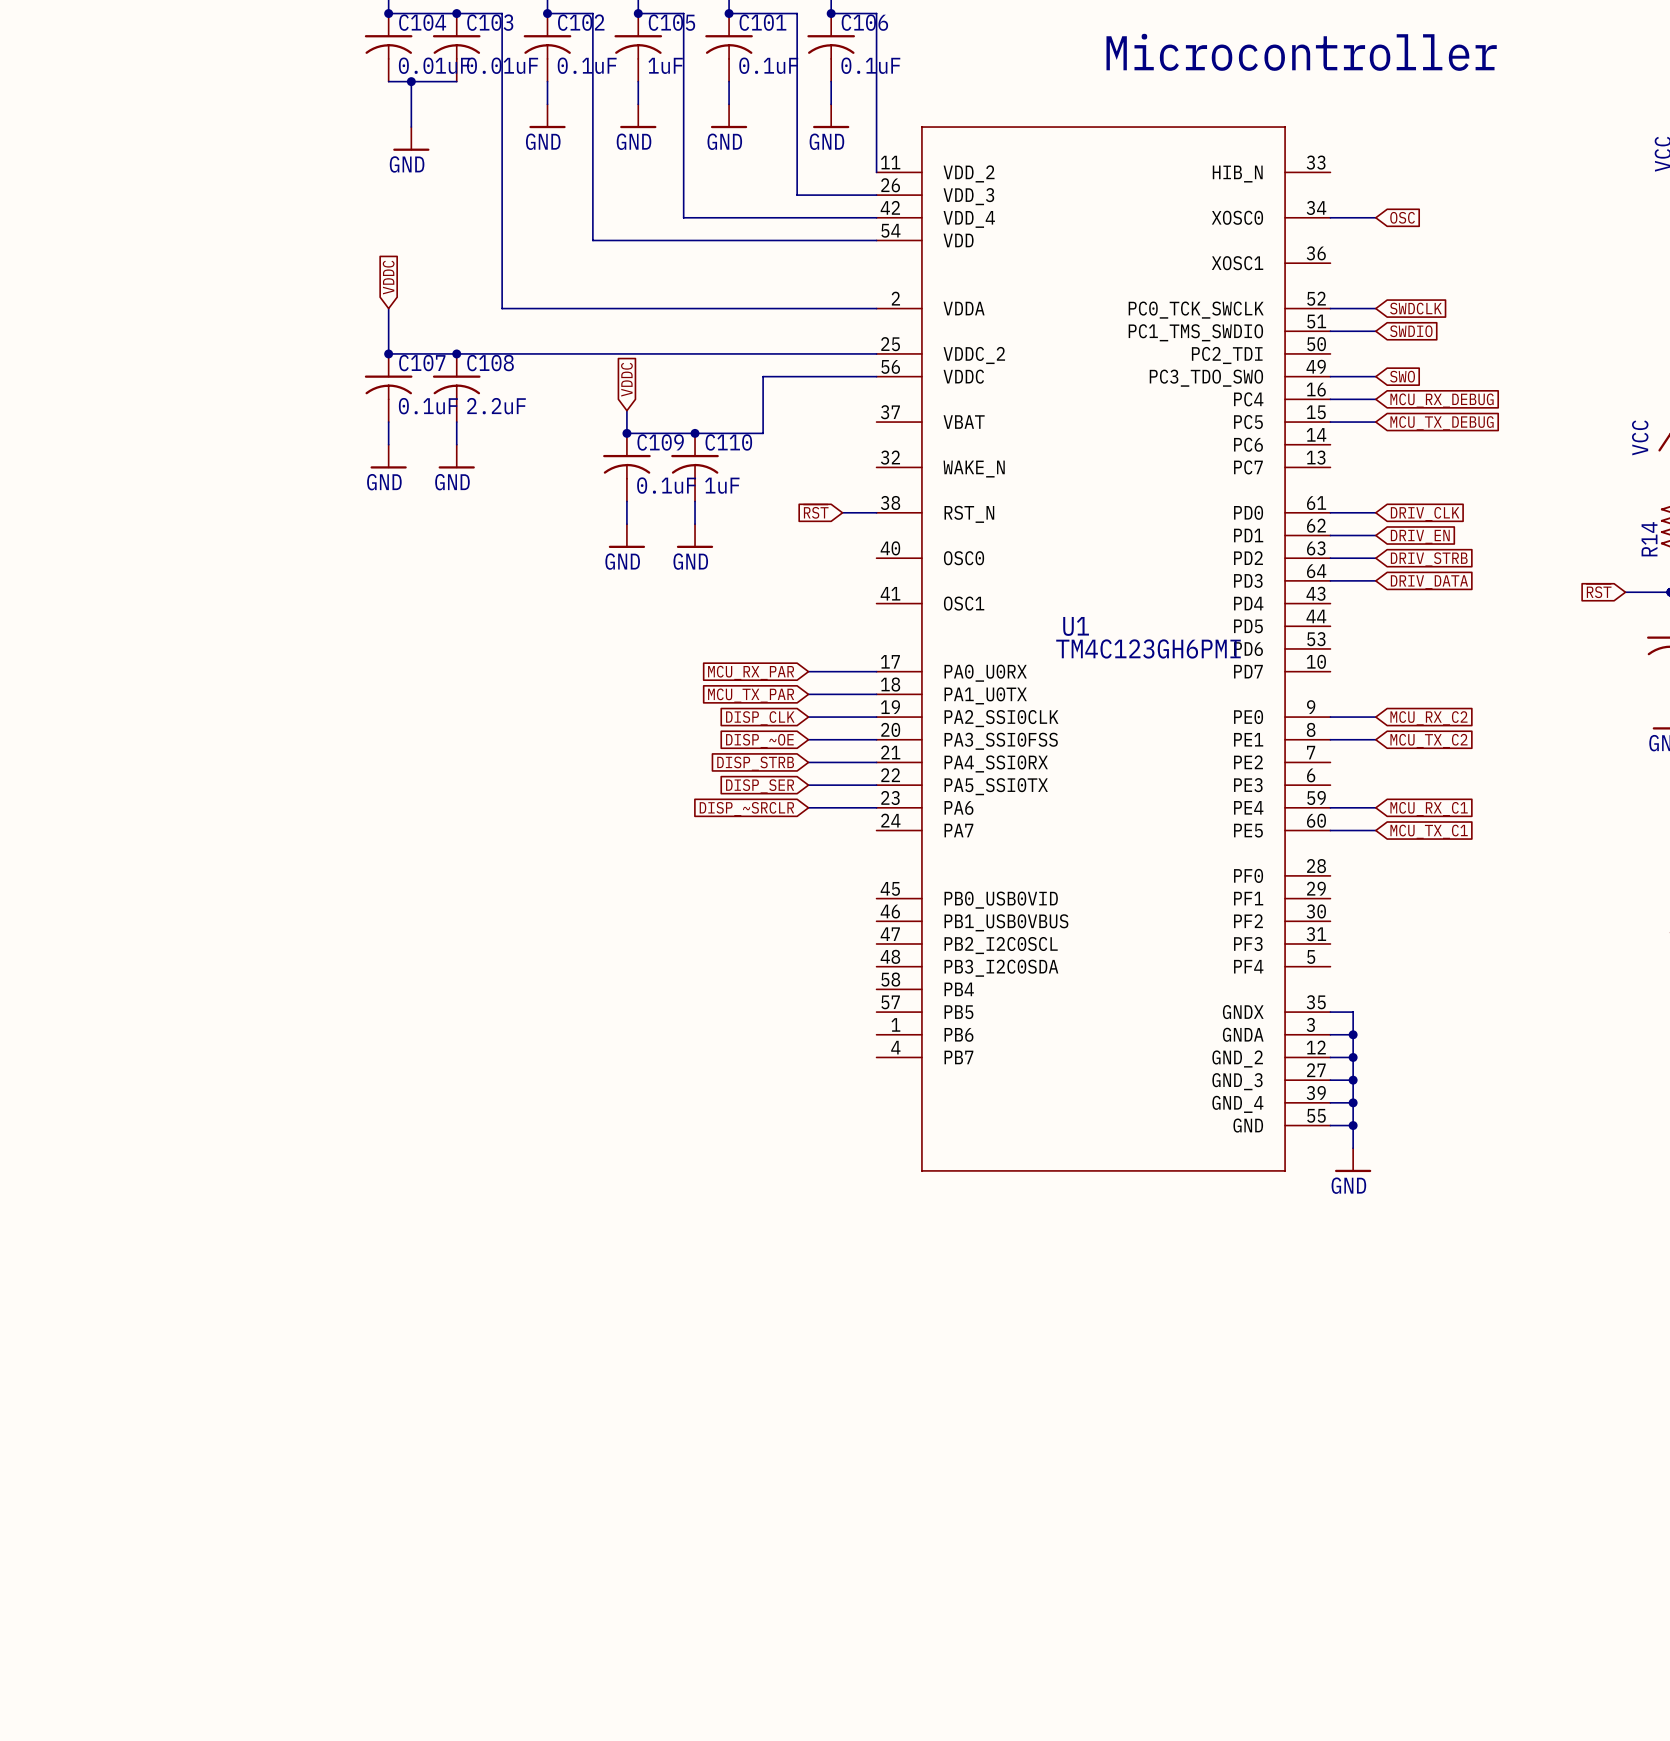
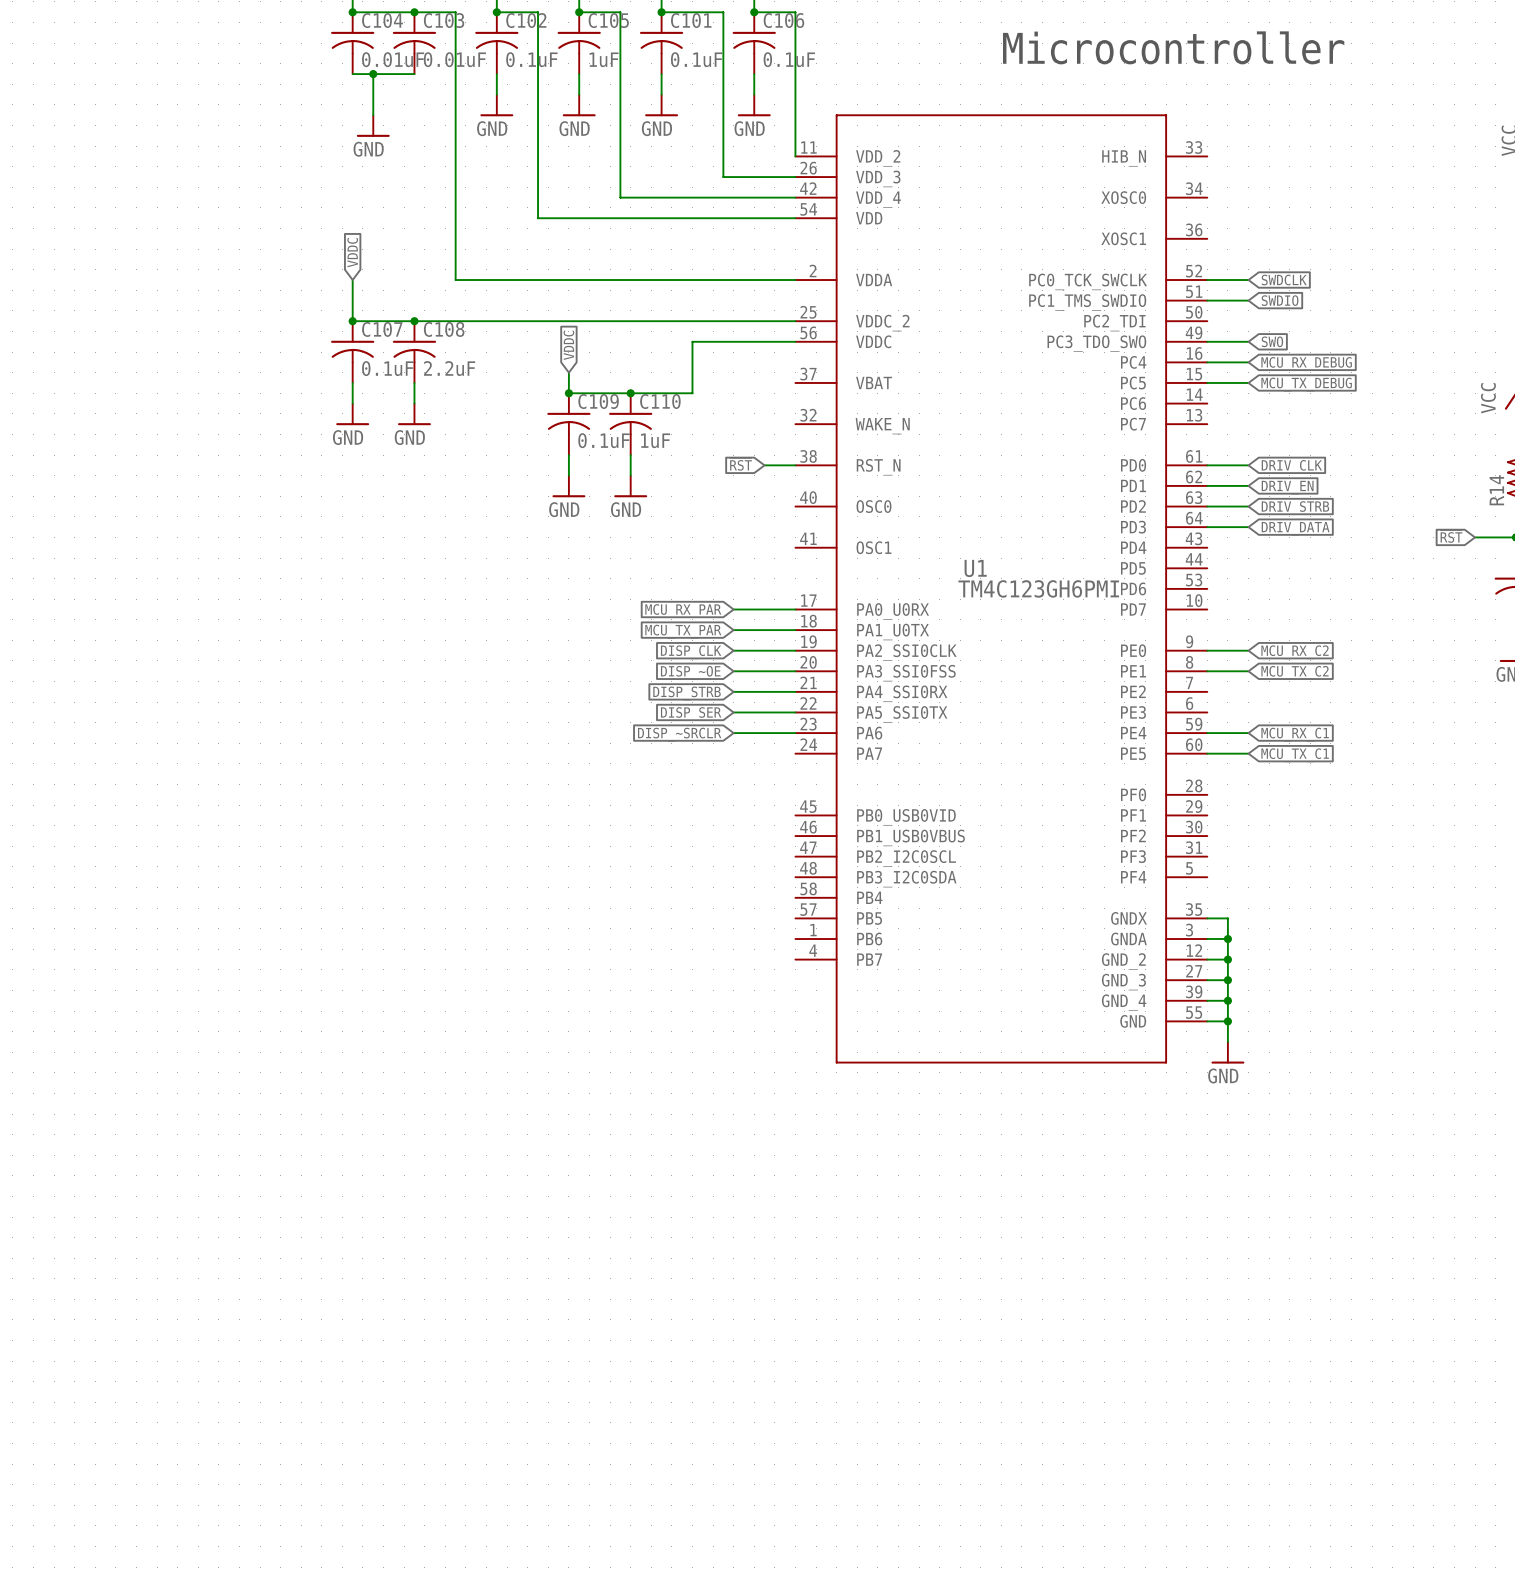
wire: (1330, 217) (1375, 217) -> none
global label: OSC (1402, 217) -> none

